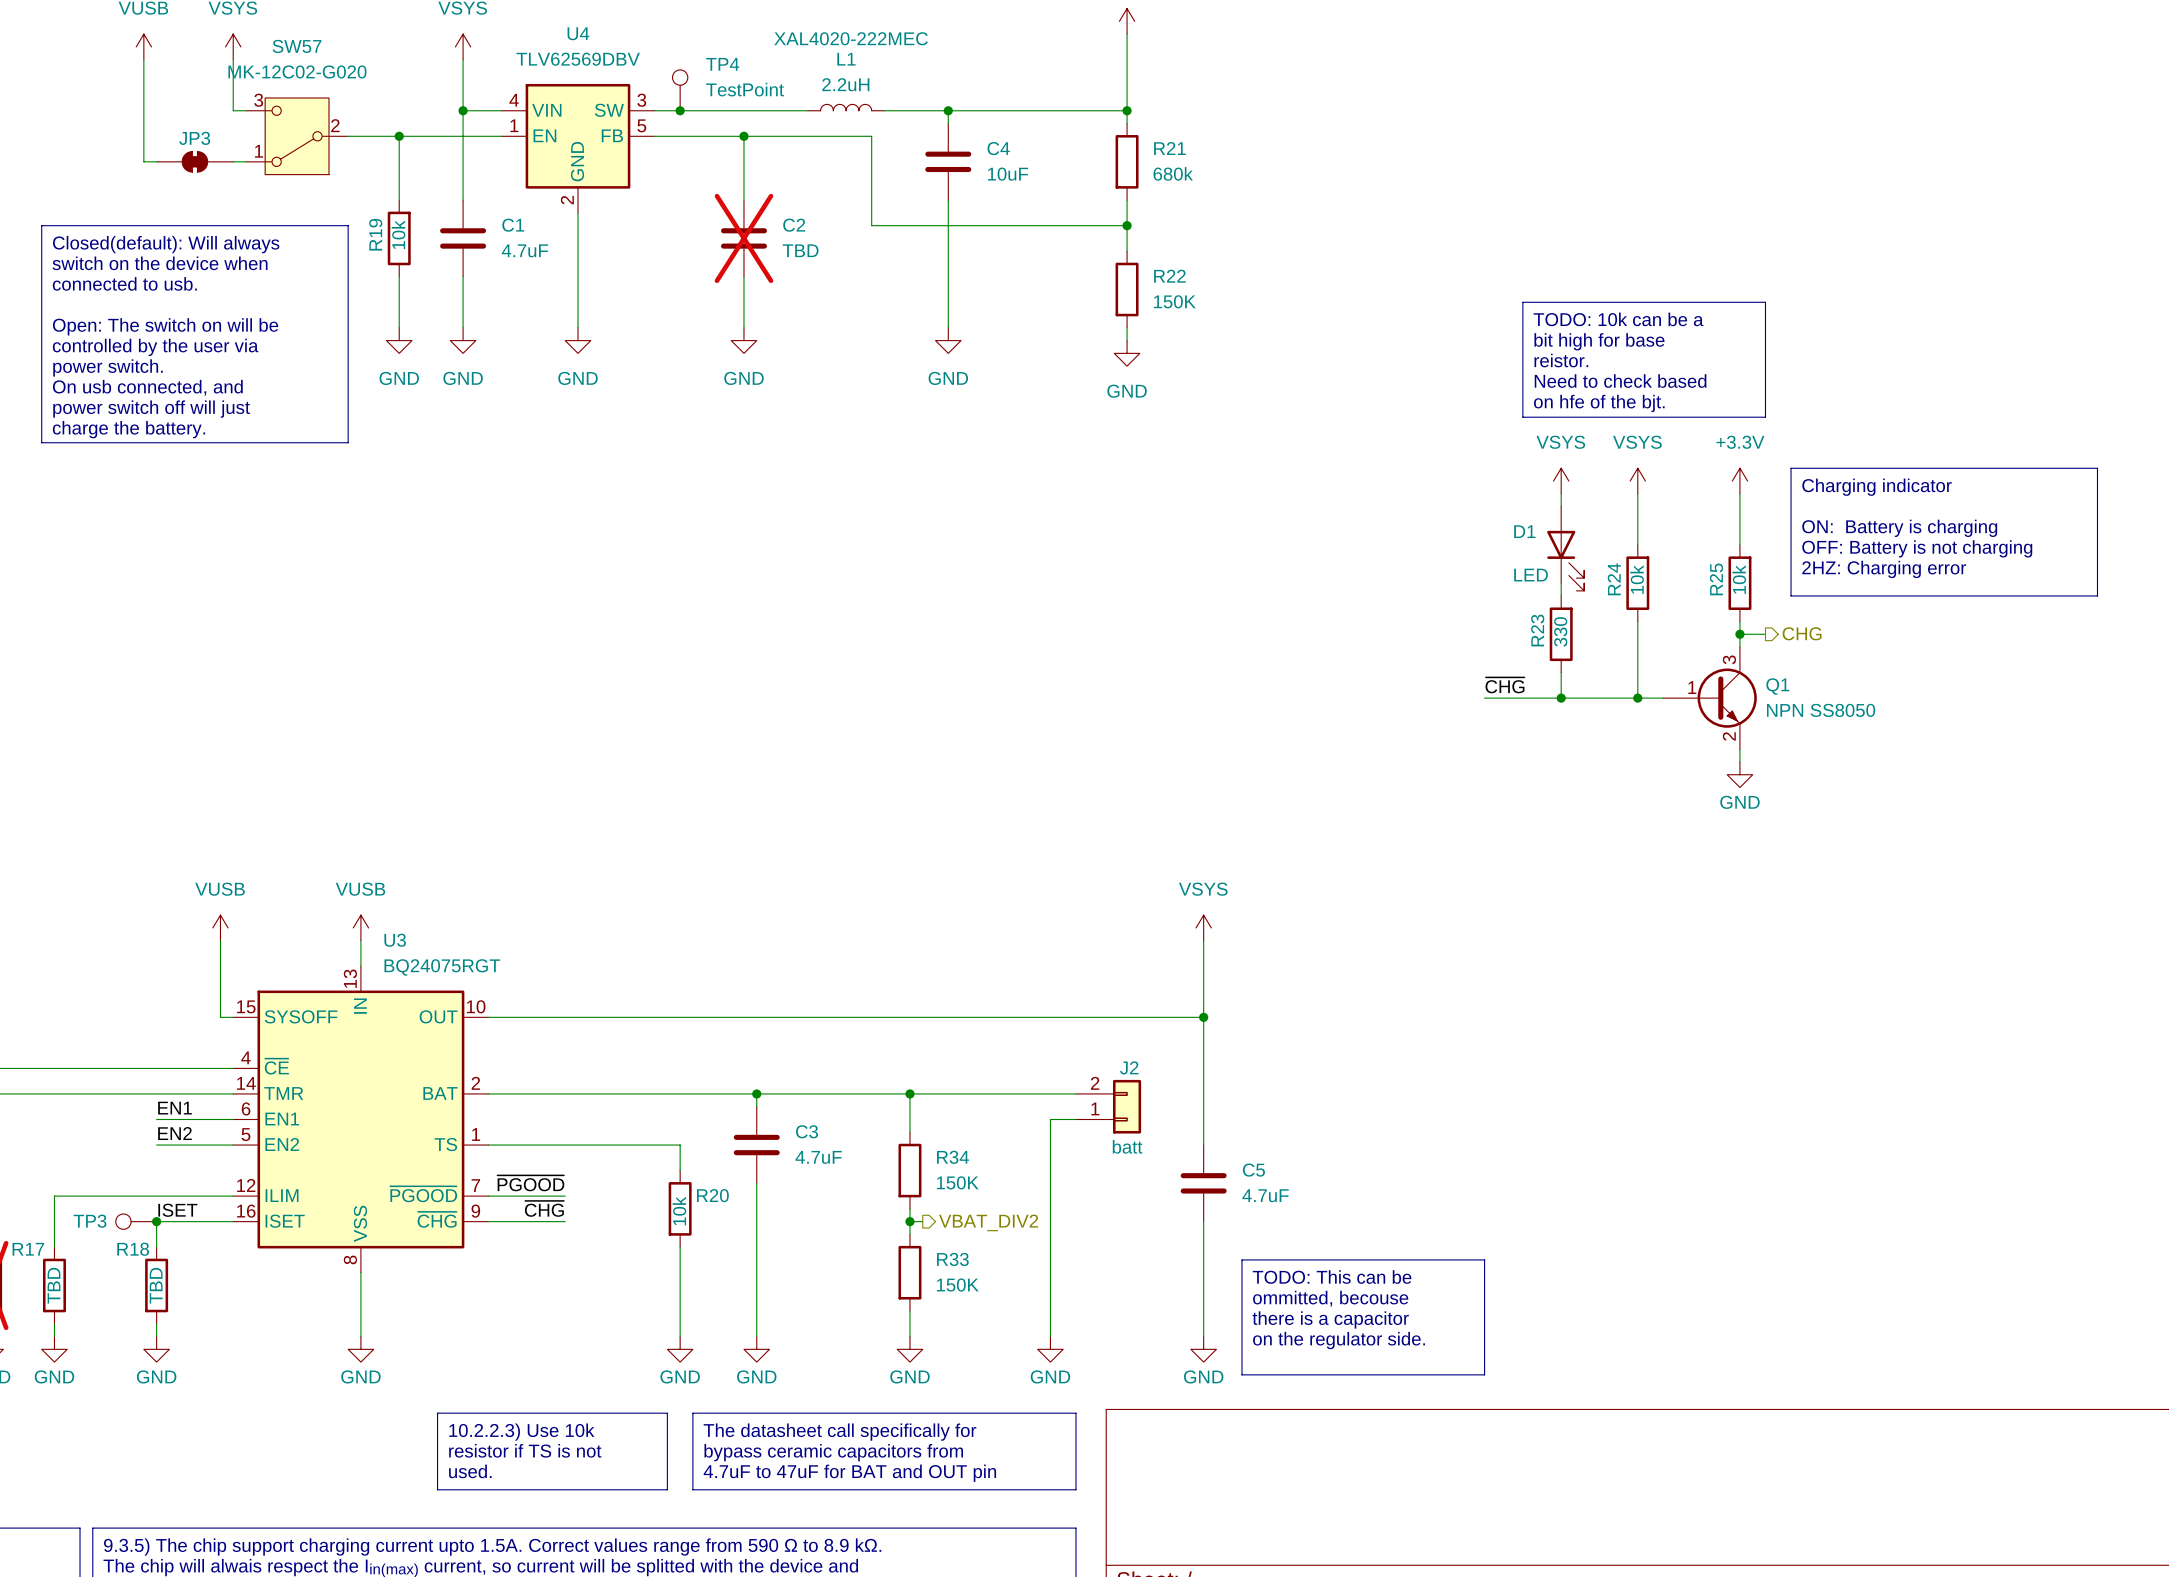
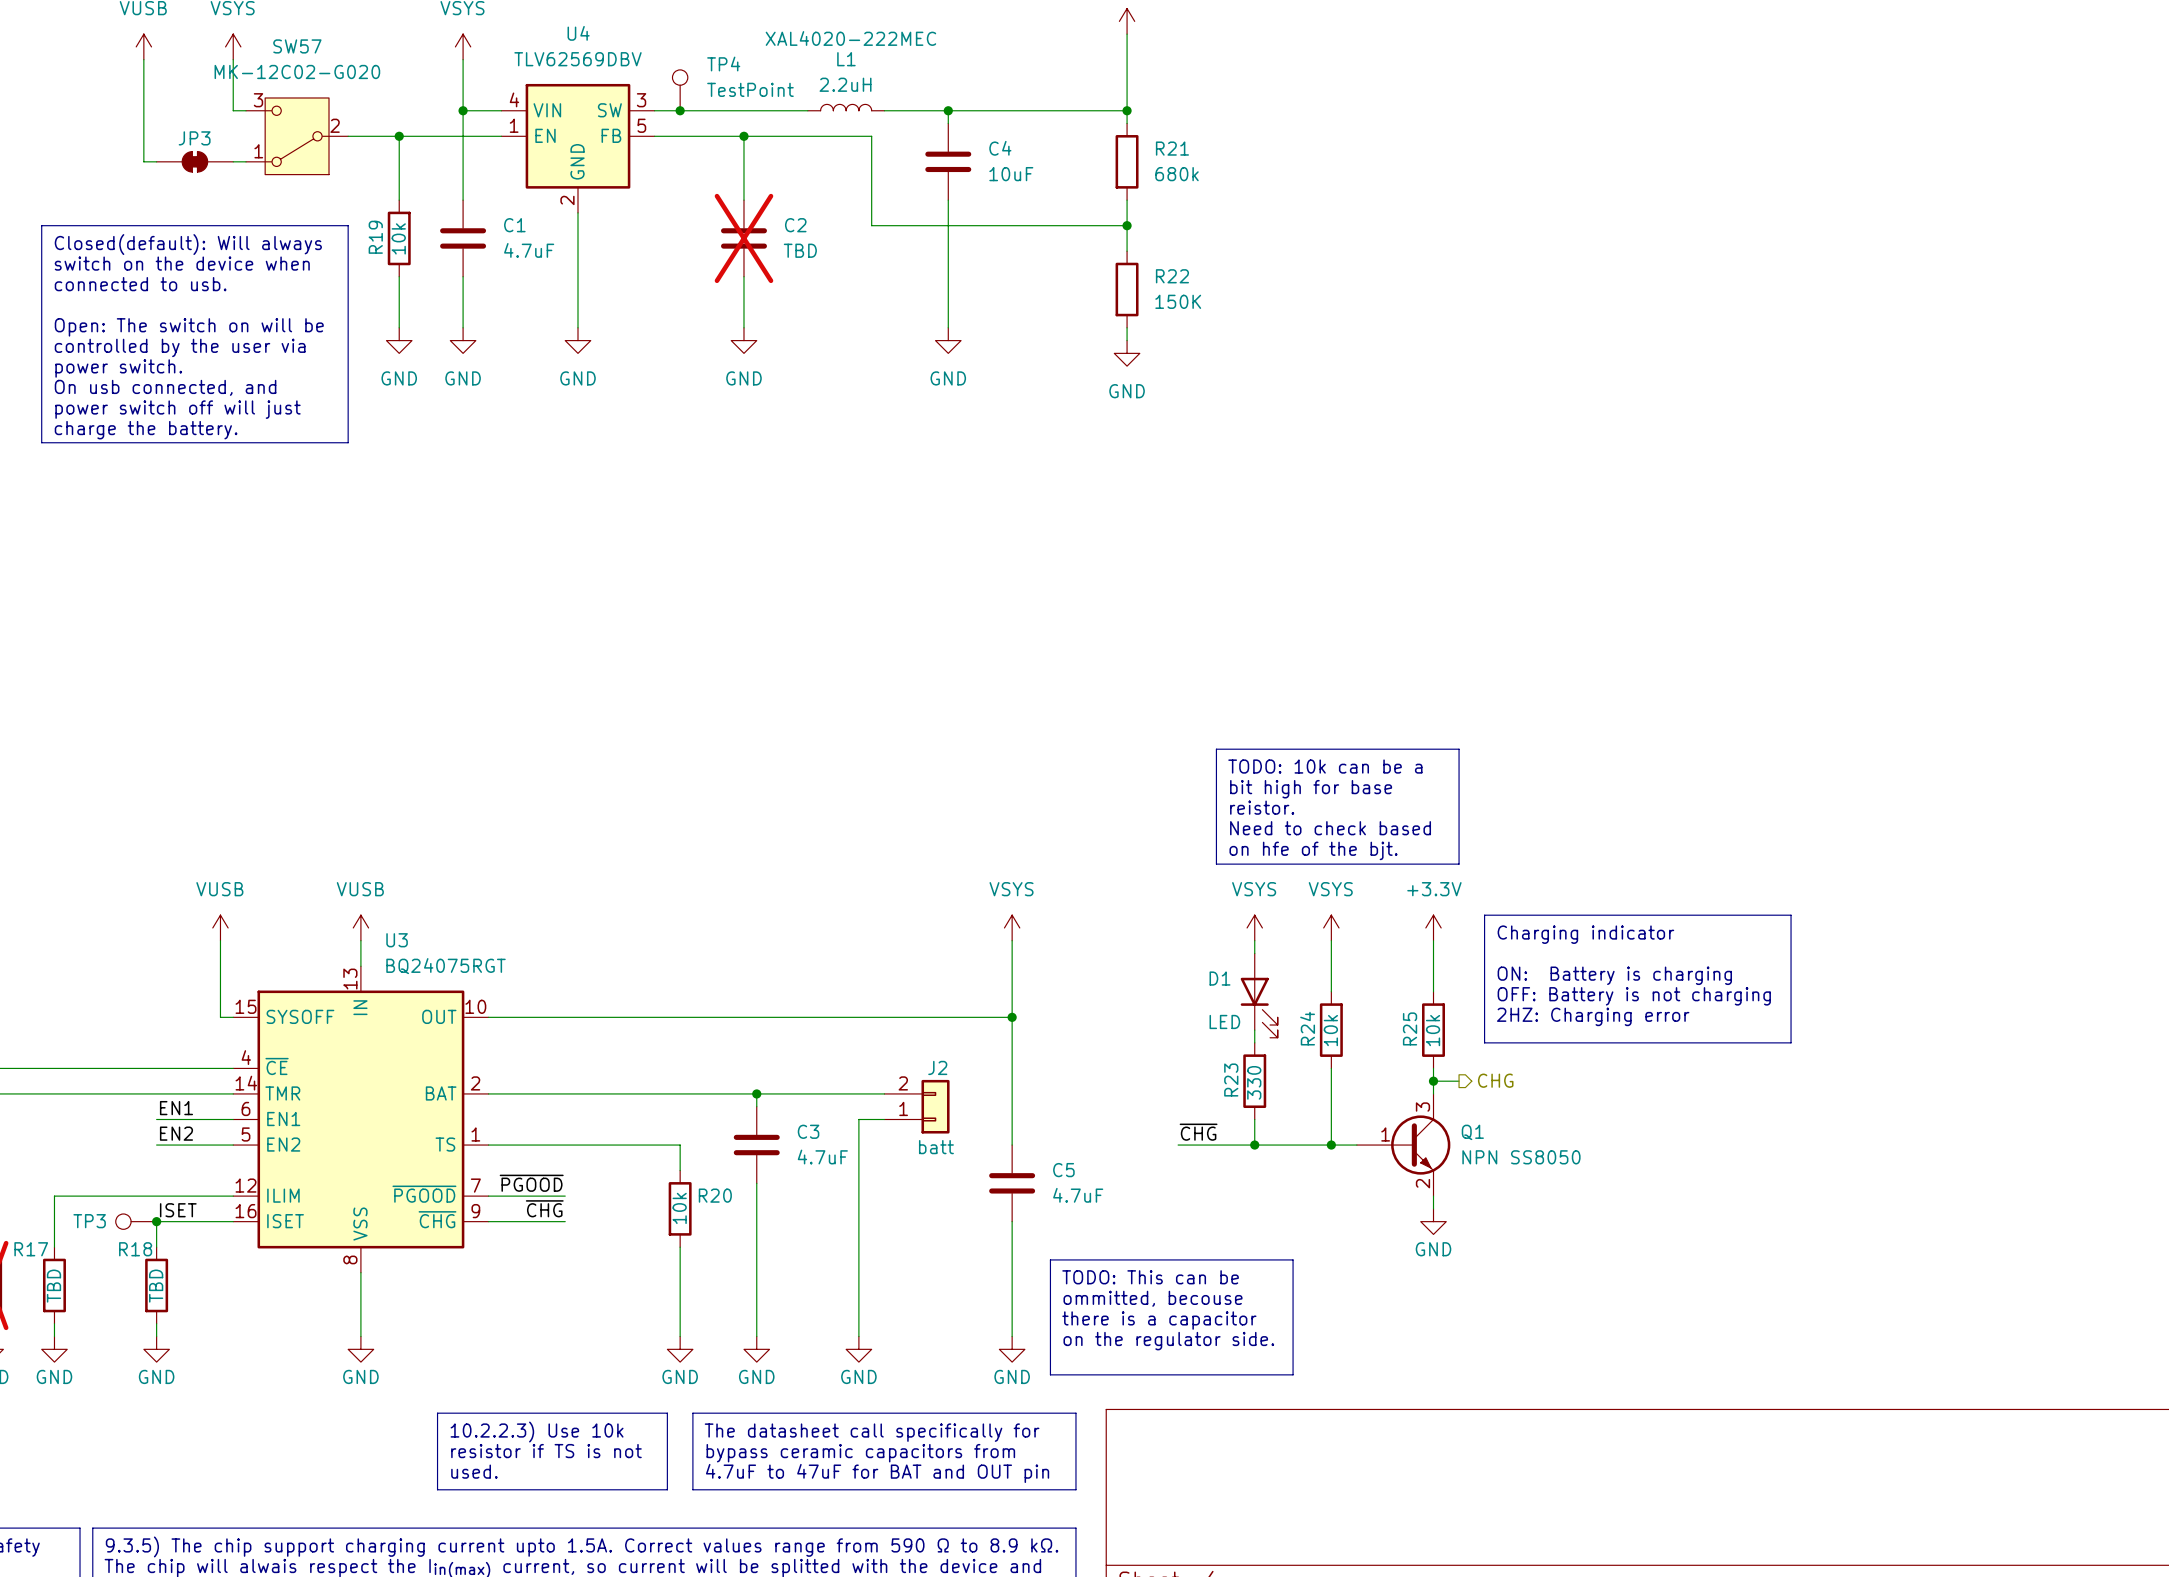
line: (1522, 302) (1765, 302) (1765, 417) (1522, 417) (1522, 302) -> none
text: TODO: 10k can be a (1618, 319) -> none
text: bit high for base (1599, 341) -> none
text: reistor. (1561, 360) -> none
text: Need to check based (1620, 381) -> none
text: on hfe of the bjt. (1599, 403) -> none
line: (1791, 468) (2097, 468) (2097, 595) (1791, 595) (1791, 468) -> none
power symbol: VSYS (1561, 481) -> none
power symbol: VSYS (1637, 481) -> none
power symbol: +3.3V (1739, 481) -> none
text: Charging indicator (1877, 487) -> none
wire: (1561, 493) (1561, 506) -> none
wire: (1637, 493) (1637, 544) -> none
wire: (1739, 493) (1739, 544) -> none
text: ON: Battery is charging (1899, 528) -> none
D1 position: (1565, 548) -> (1259, 995)
text: OFF: Battery is not charging (1917, 548) -> none
text: 2HZ: Charging error (1884, 569) -> none
wire: (1561, 583) (1561, 595) -> none
R24 position: (1637, 583) -> (1331, 1030)
R25 position: (1739, 583) -> (1433, 1030)
wire: (1637, 621) (1637, 698) -> none
wire: (1739, 621) (1739, 647) -> none
hierarchical label: CHG (1802, 633) -> none
R23 position: (1561, 634) -> (1254, 1081)
wire: (1739, 634) (1765, 634) -> none
junction: (1739, 634) -> none
wire: (1561, 672) (1561, 698) -> none
label: ~{CHG} (1505, 685) -> none
wire: (1484, 698) (1663, 698) -> none
junction: (1561, 698) -> none
junction: (1637, 698) -> none
Q1 position: (1710, 698) -> (1403, 1145)
line: none -> (1216, 749) (1459, 749) (1459, 864) (1216, 864) (1216, 749)
wire: (1739, 749) (1739, 761) -> none
text: none -> TODO: 10k can be a (1325, 766)
power symbol: GND (1739, 774) -> none
text: none -> bit high for base (1311, 789)
text: none -> reistor. (1262, 807)
text: none -> Need to check based (1330, 828)
text: none -> on hfe of the bjt. (1313, 850)
line: none -> (1484, 915) (1791, 915) (1791, 1042) (1484, 1042) (1484, 915)
power symbol: none -> VSYS (1012, 927)
power symbol position: VSYS (1203, 927) -> VSYS (1254, 927)
power symbol: none -> VSYS (1331, 927)
power symbol: none -> +3.3V (1433, 927)
text: none -> Charging indicator (1585, 934)
wire: (1203, 940) (1203, 1145) -> (1012, 940) (1012, 1145)
wire: none -> (1254, 940) (1254, 953)
wire: none -> (1331, 940) (1331, 991)
wire: none -> (1433, 940) (1433, 991)
text: none -> ON: Battery is charging (1614, 975)
text: none -> OFF: Battery is not charging (1634, 996)
text: none -> 2HZ: Charging error (1593, 1016)
wire: (1012, 1017) (1203, 1017) -> none
junction: none -> (1012, 1017)
junction: (1203, 1017) -> none
wire: none -> (1254, 1030) (1254, 1042)
wire: none -> (1331, 1068) (1331, 1145)
wire: none -> (1433, 1068) (1433, 1093)
hierarchical label: none -> CHG (1495, 1080)
wire: none -> (1433, 1081) (1459, 1081)
junction: none -> (1433, 1081)
wire: (884, 1093) (1075, 1093) -> none
wire: (909, 1093) (909, 1132) -> none
junction: (909, 1093) -> none
J2 position: (1108, 1106) -> (917, 1106)
wire: (1075, 1119) (1050, 1119) (1050, 1336) -> (884, 1119) (858, 1119) (858, 1336)
wire: none -> (1254, 1119) (1254, 1145)
label: none -> ~{CHG} (1198, 1132)
wire: none -> (1178, 1145) (1356, 1145)
junction: none -> (1254, 1145)
junction: none -> (1331, 1145)
R34: 150K (909, 1170) -> none
C5 position: (1203, 1183) -> (1012, 1183)
wire: none -> (1433, 1196) (1433, 1208)
wire: (909, 1208) (909, 1234) -> none
wire: (909, 1221) (922, 1221) -> none
junction: (909, 1221) -> none
wire: (1203, 1221) (1203, 1336) -> (1012, 1221) (1012, 1336)
power symbol: none -> GND (1433, 1221)
hierarchical label: VBAT_DIV2 (988, 1222) -> none
line: (1241, 1259) (1241, 1374) -> (1241, 1259) (1050, 1259) (1050, 1374) (1241, 1374)
line: (1293, 1259) (1484, 1259) (1484, 1374) (1293, 1374) -> (1293, 1259) (1293, 1374)
R33: 150K (909, 1272) -> none
text position: TODO: This can be (1332, 1277) -> TODO: This can be (1150, 1277)
text position: ommitted, becouse (1330, 1298) -> ommitted, becouse (1152, 1298)
wire: (909, 1311) (909, 1336) -> none
text position: there is a capacitor (1330, 1319) -> there is a capacitor (1159, 1320)
text position: on the regulator side. (1339, 1340) -> on the regulator side. (1168, 1341)
power symbol: none -> GND (858, 1349)
power symbol: GND (909, 1349) -> none
power symbol position: GND (1050, 1349) -> GND (1012, 1349)
power symbol: GND (1203, 1349) -> none

